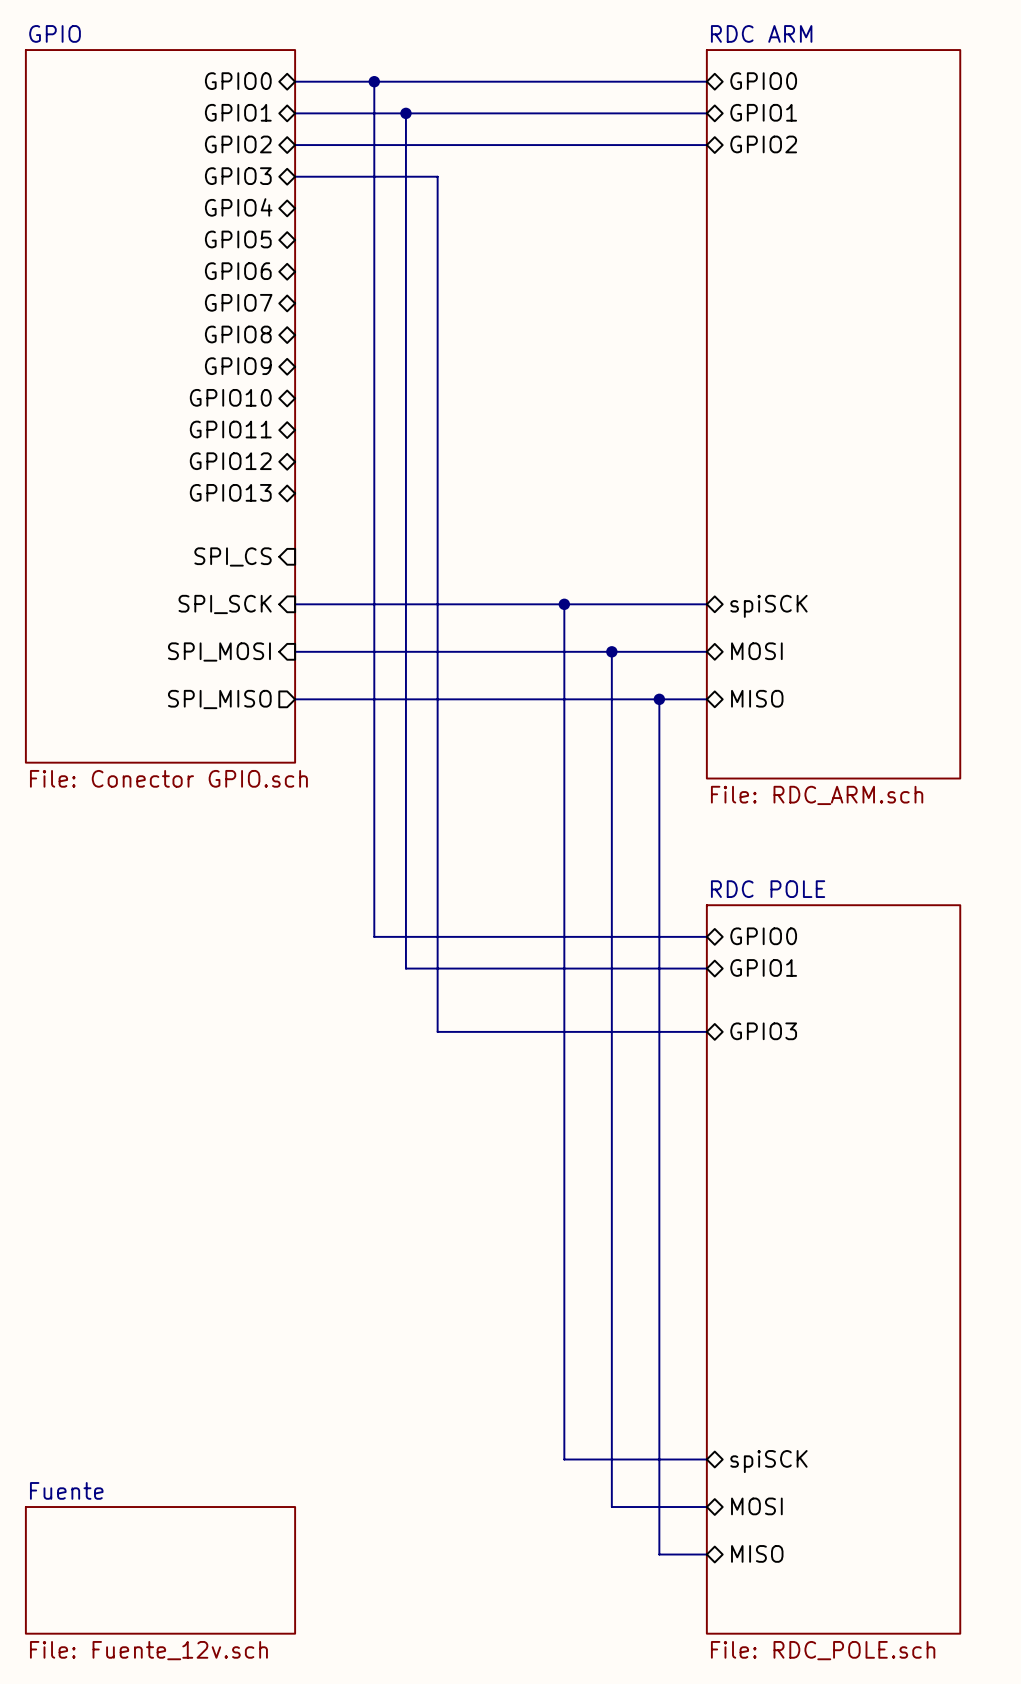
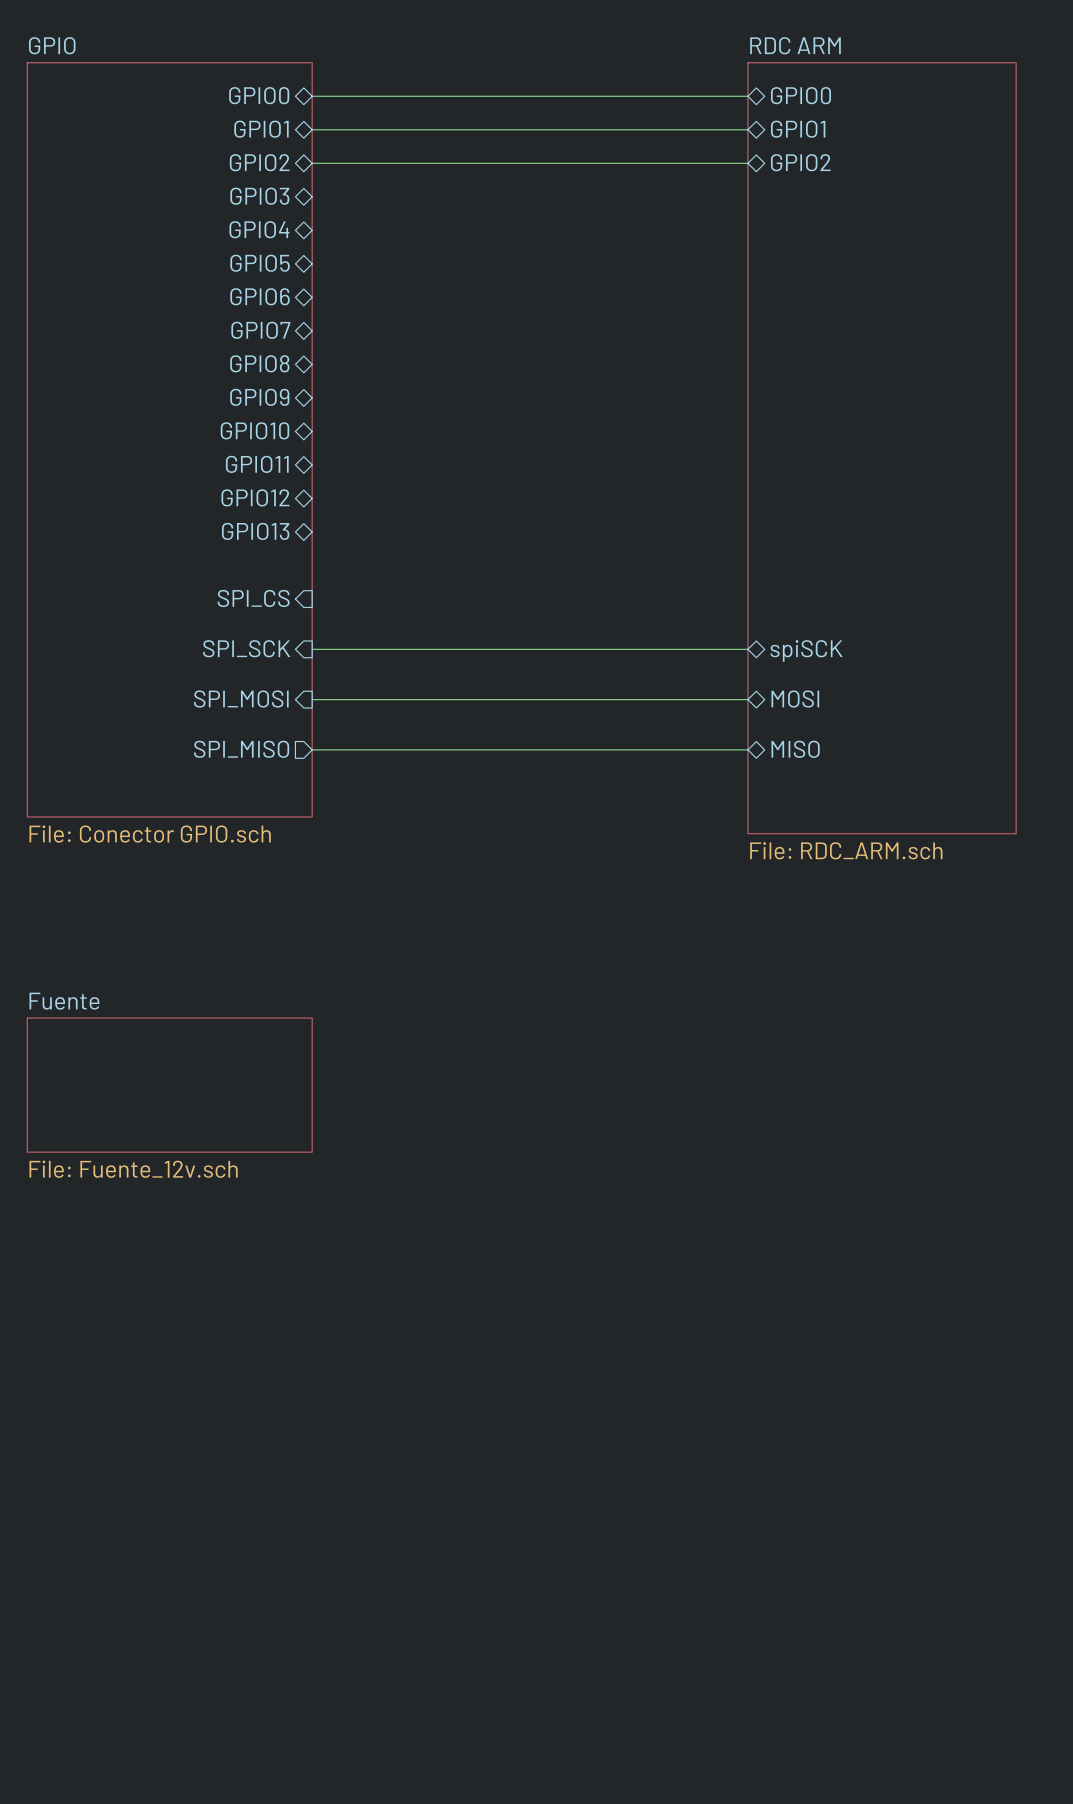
wire: (374, 81) (374, 936) (706, 936) -> none
junction: (374, 81) -> none
wire: (405, 113) (405, 968) (706, 968) -> none
junction: (405, 113) -> none
wire: (295, 176) (437, 176) (437, 1031) (706, 1031) -> none
wire: (564, 604) (564, 1459) (706, 1459) -> none
junction: (564, 604) -> none
wire: (611, 651) (611, 1507) (706, 1507) -> none
junction: (611, 651) -> none
wire: (659, 699) (659, 1554) (706, 1554) -> none
junction: (659, 699) -> none
sheet pin: GPIO0 (763, 936) -> none
sheet pin: GPIO1 (763, 967) -> none
sheet Fuente: none -> File: Fuente_12v.sch (169, 1085)
sheet pin: GPIO3 (763, 1031) -> none
sheet RDC POLE: File: RDC_POLE.sch (833, 1269) -> none
sheet pin: spiSCK (768, 1461) -> none
sheet pin: MOSI (756, 1506) -> none
sheet pin: MISO (757, 1553) -> none
sheet Fuente: File: Fuente_12v.sch (160, 1570) -> none

